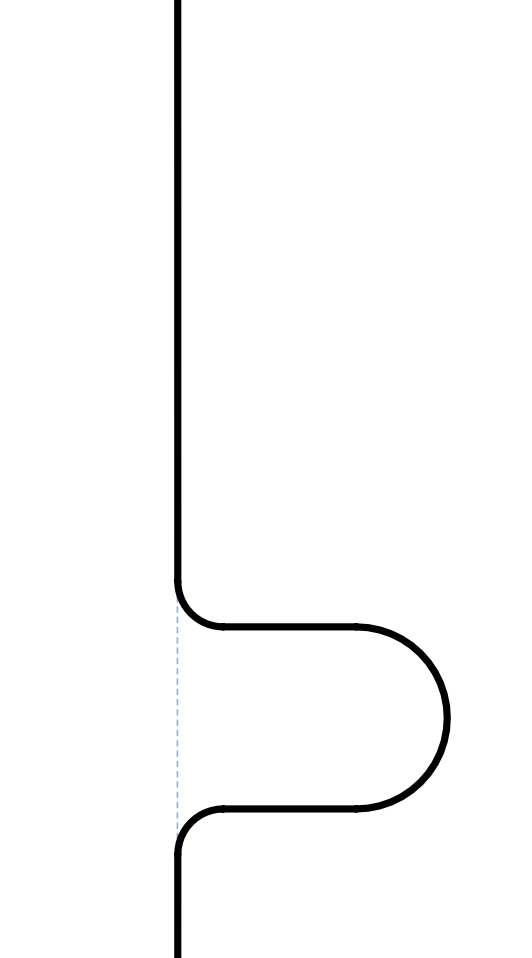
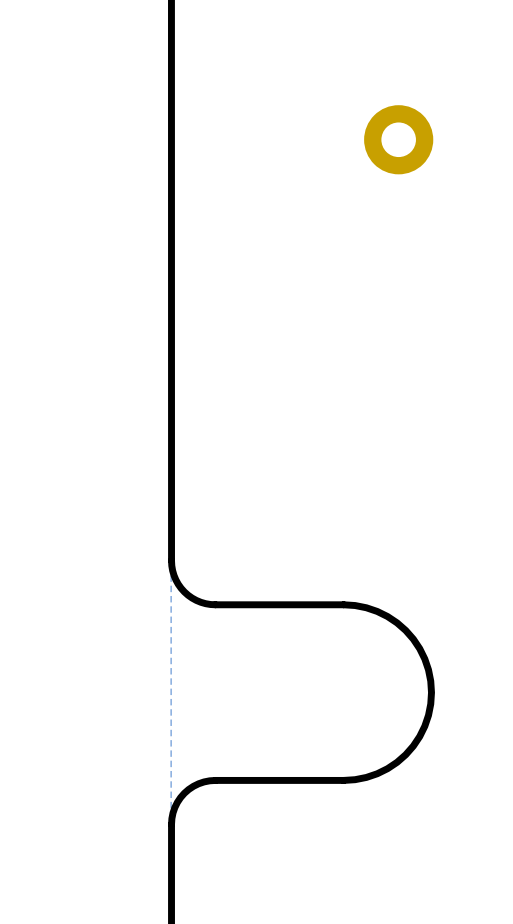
part: none -> (398, 139)

